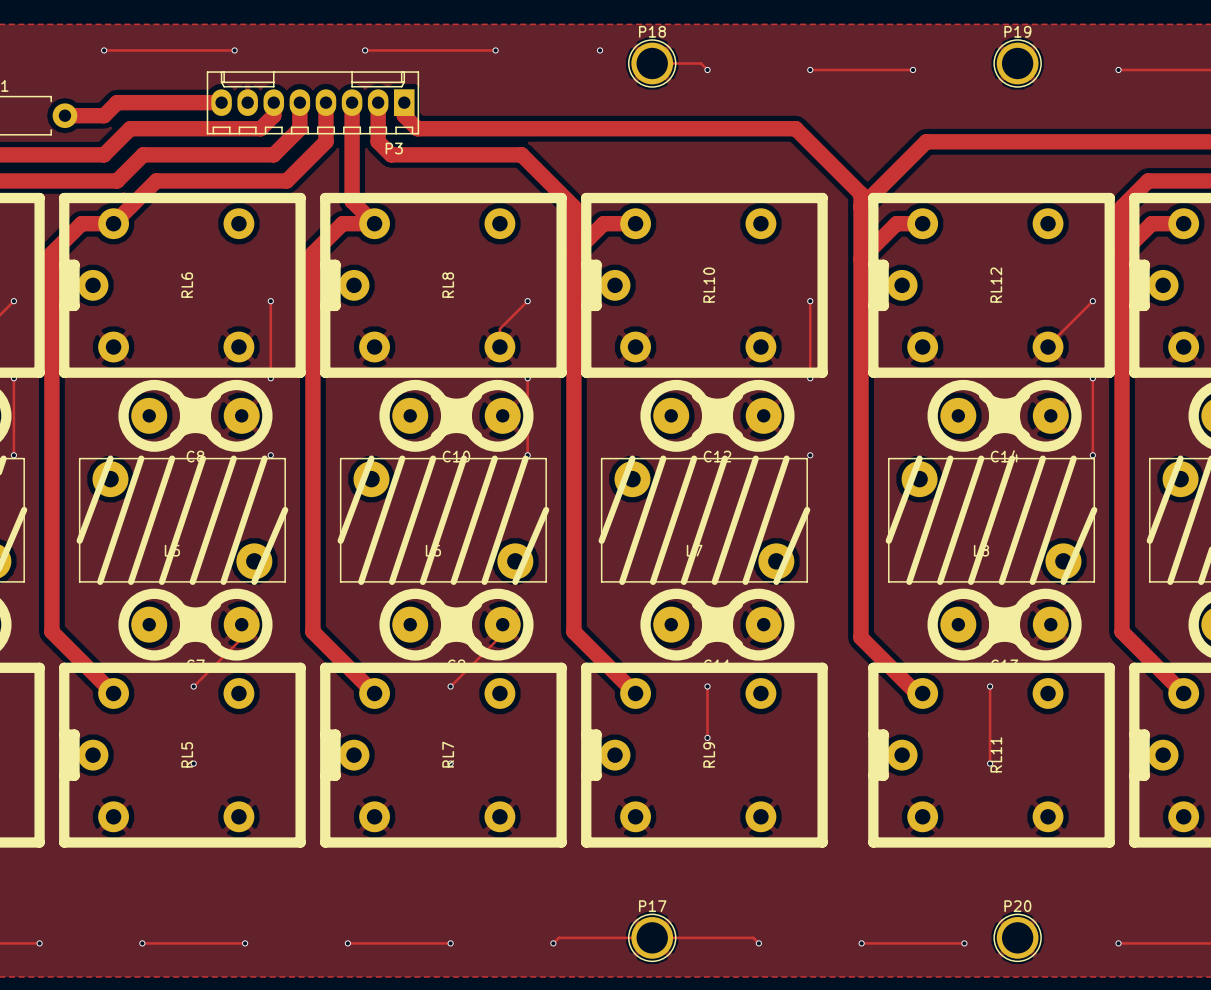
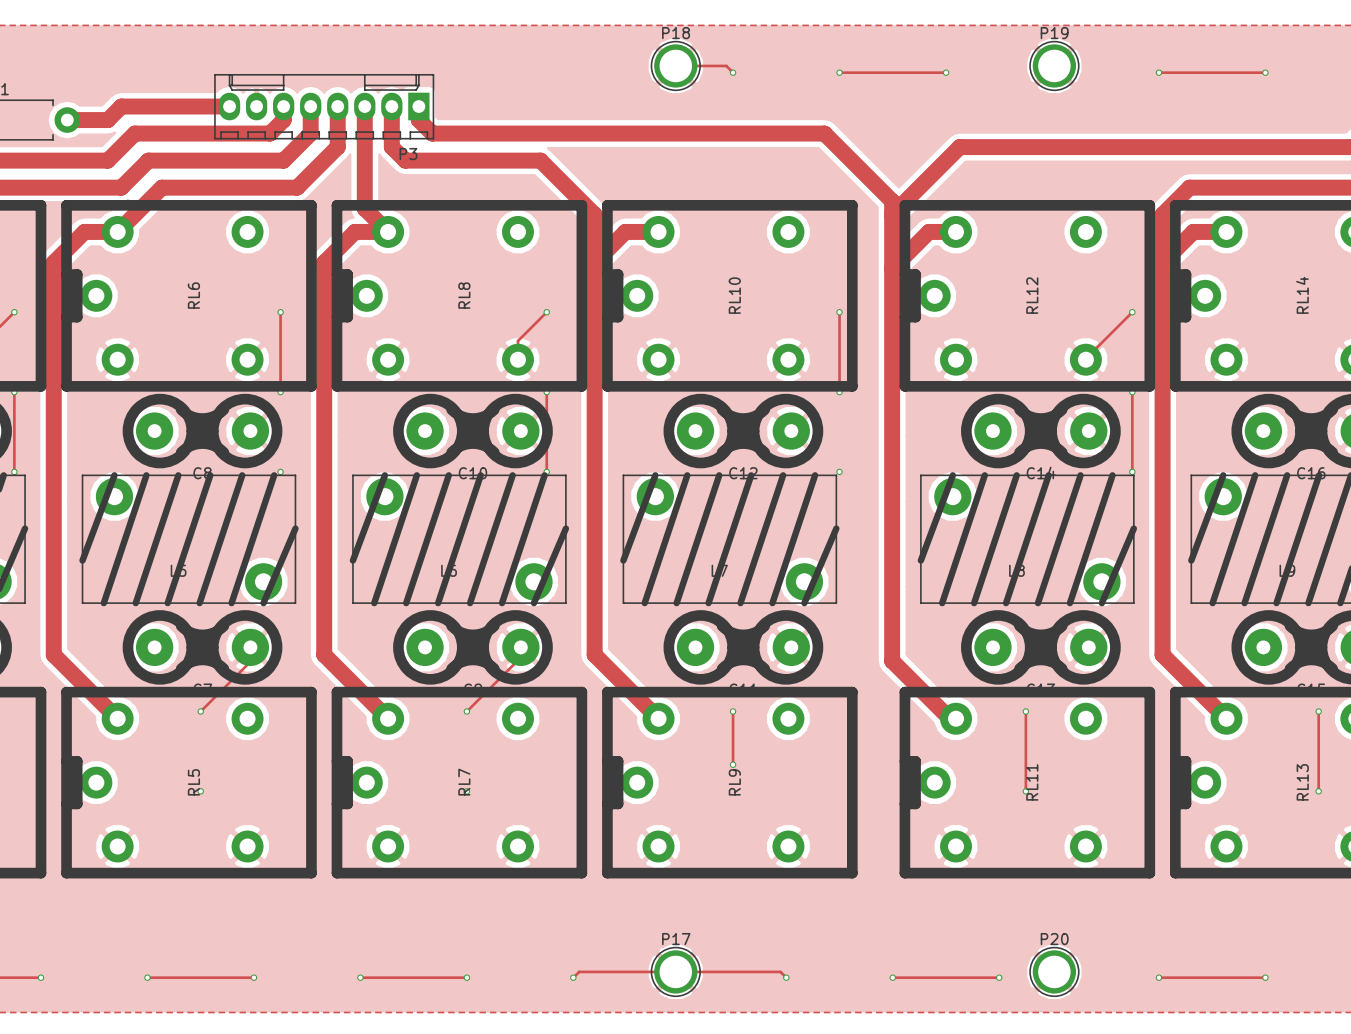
track: (104, 50) (234, 50) -> none
via: (104, 50) -> none
via: (234, 50) -> none
track: (365, 50) (495, 50) -> none
via: (365, 50) -> none
via: (495, 50) -> none
via: (600, 50) -> none

